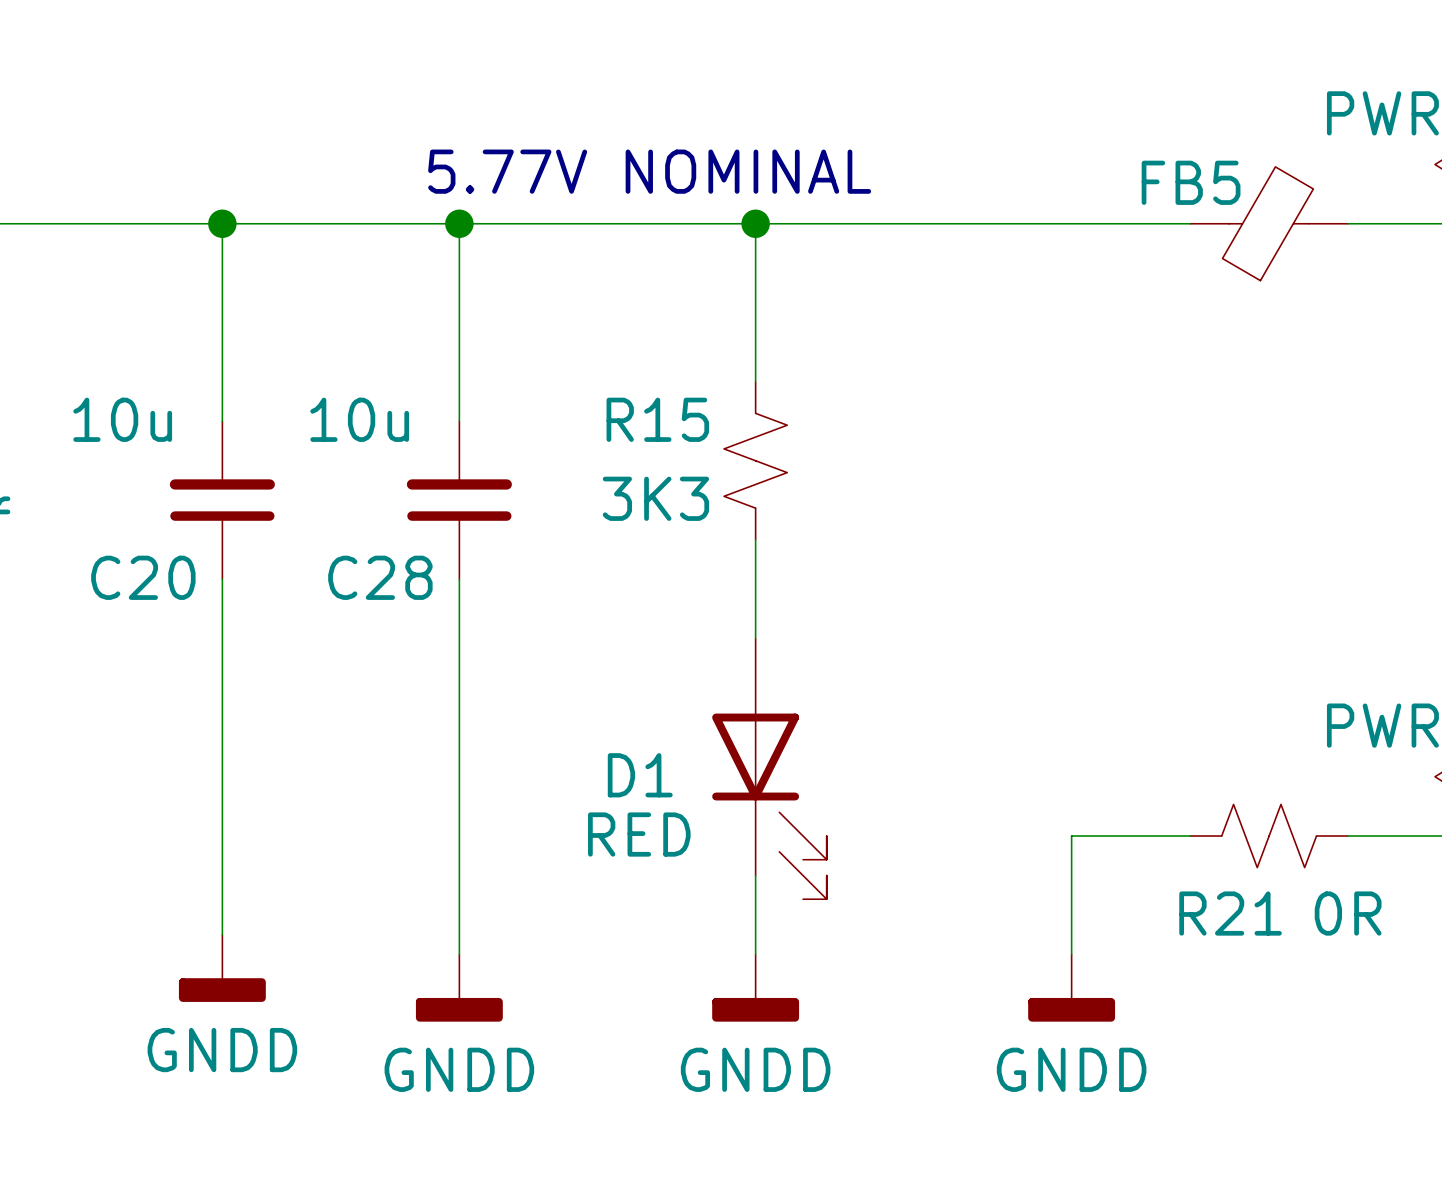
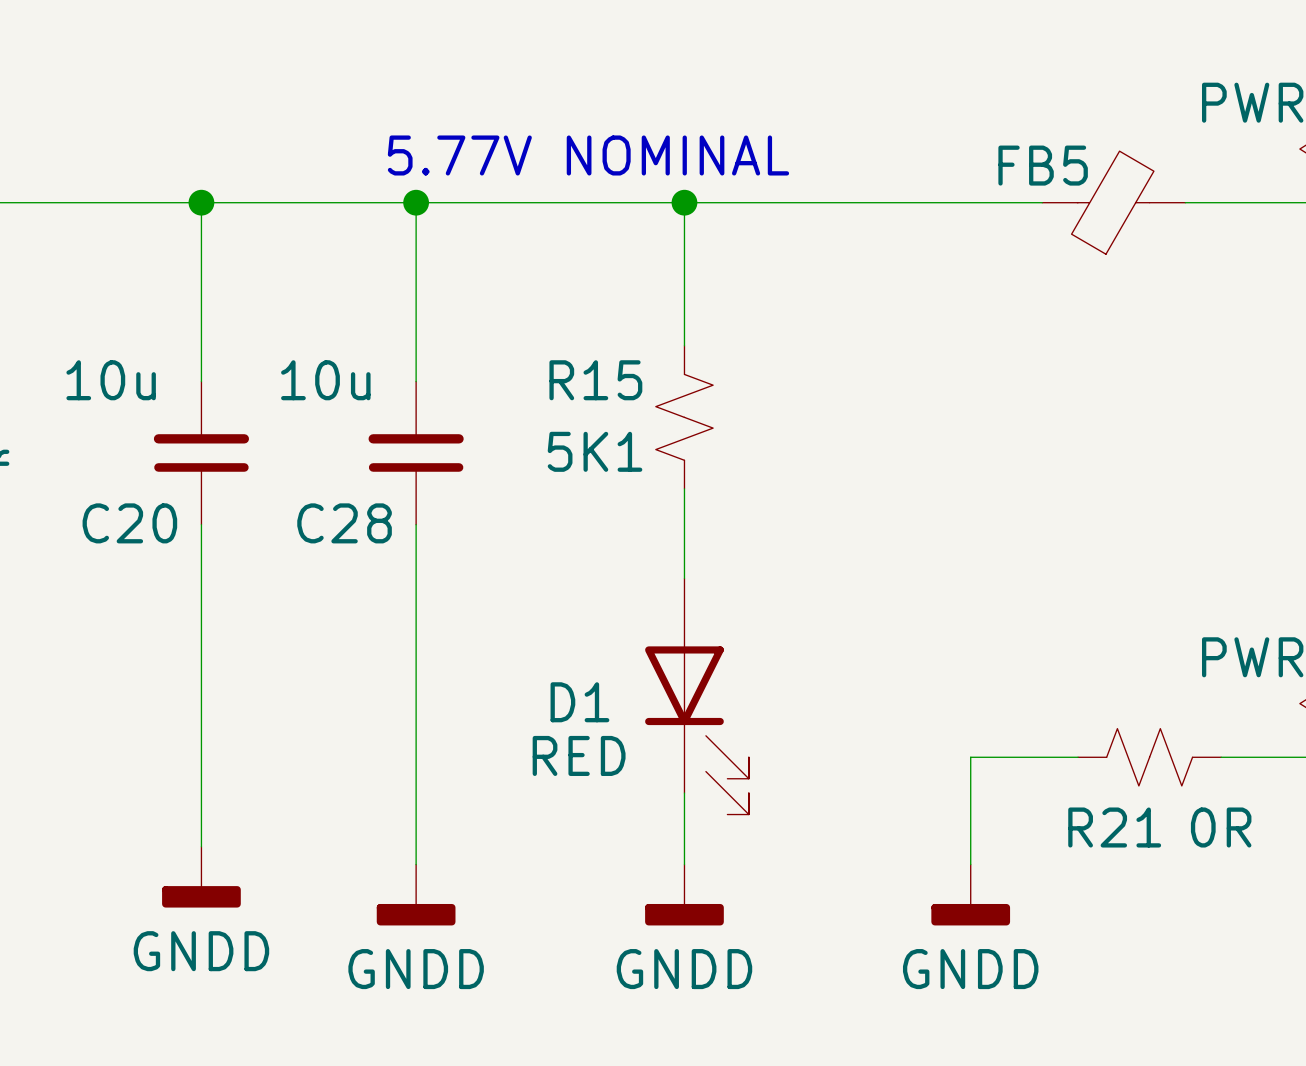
FB5 position: (1269, 223) -> (1113, 202)
R15 value: 3K3 (655, 498) -> 5K1 (595, 451)

